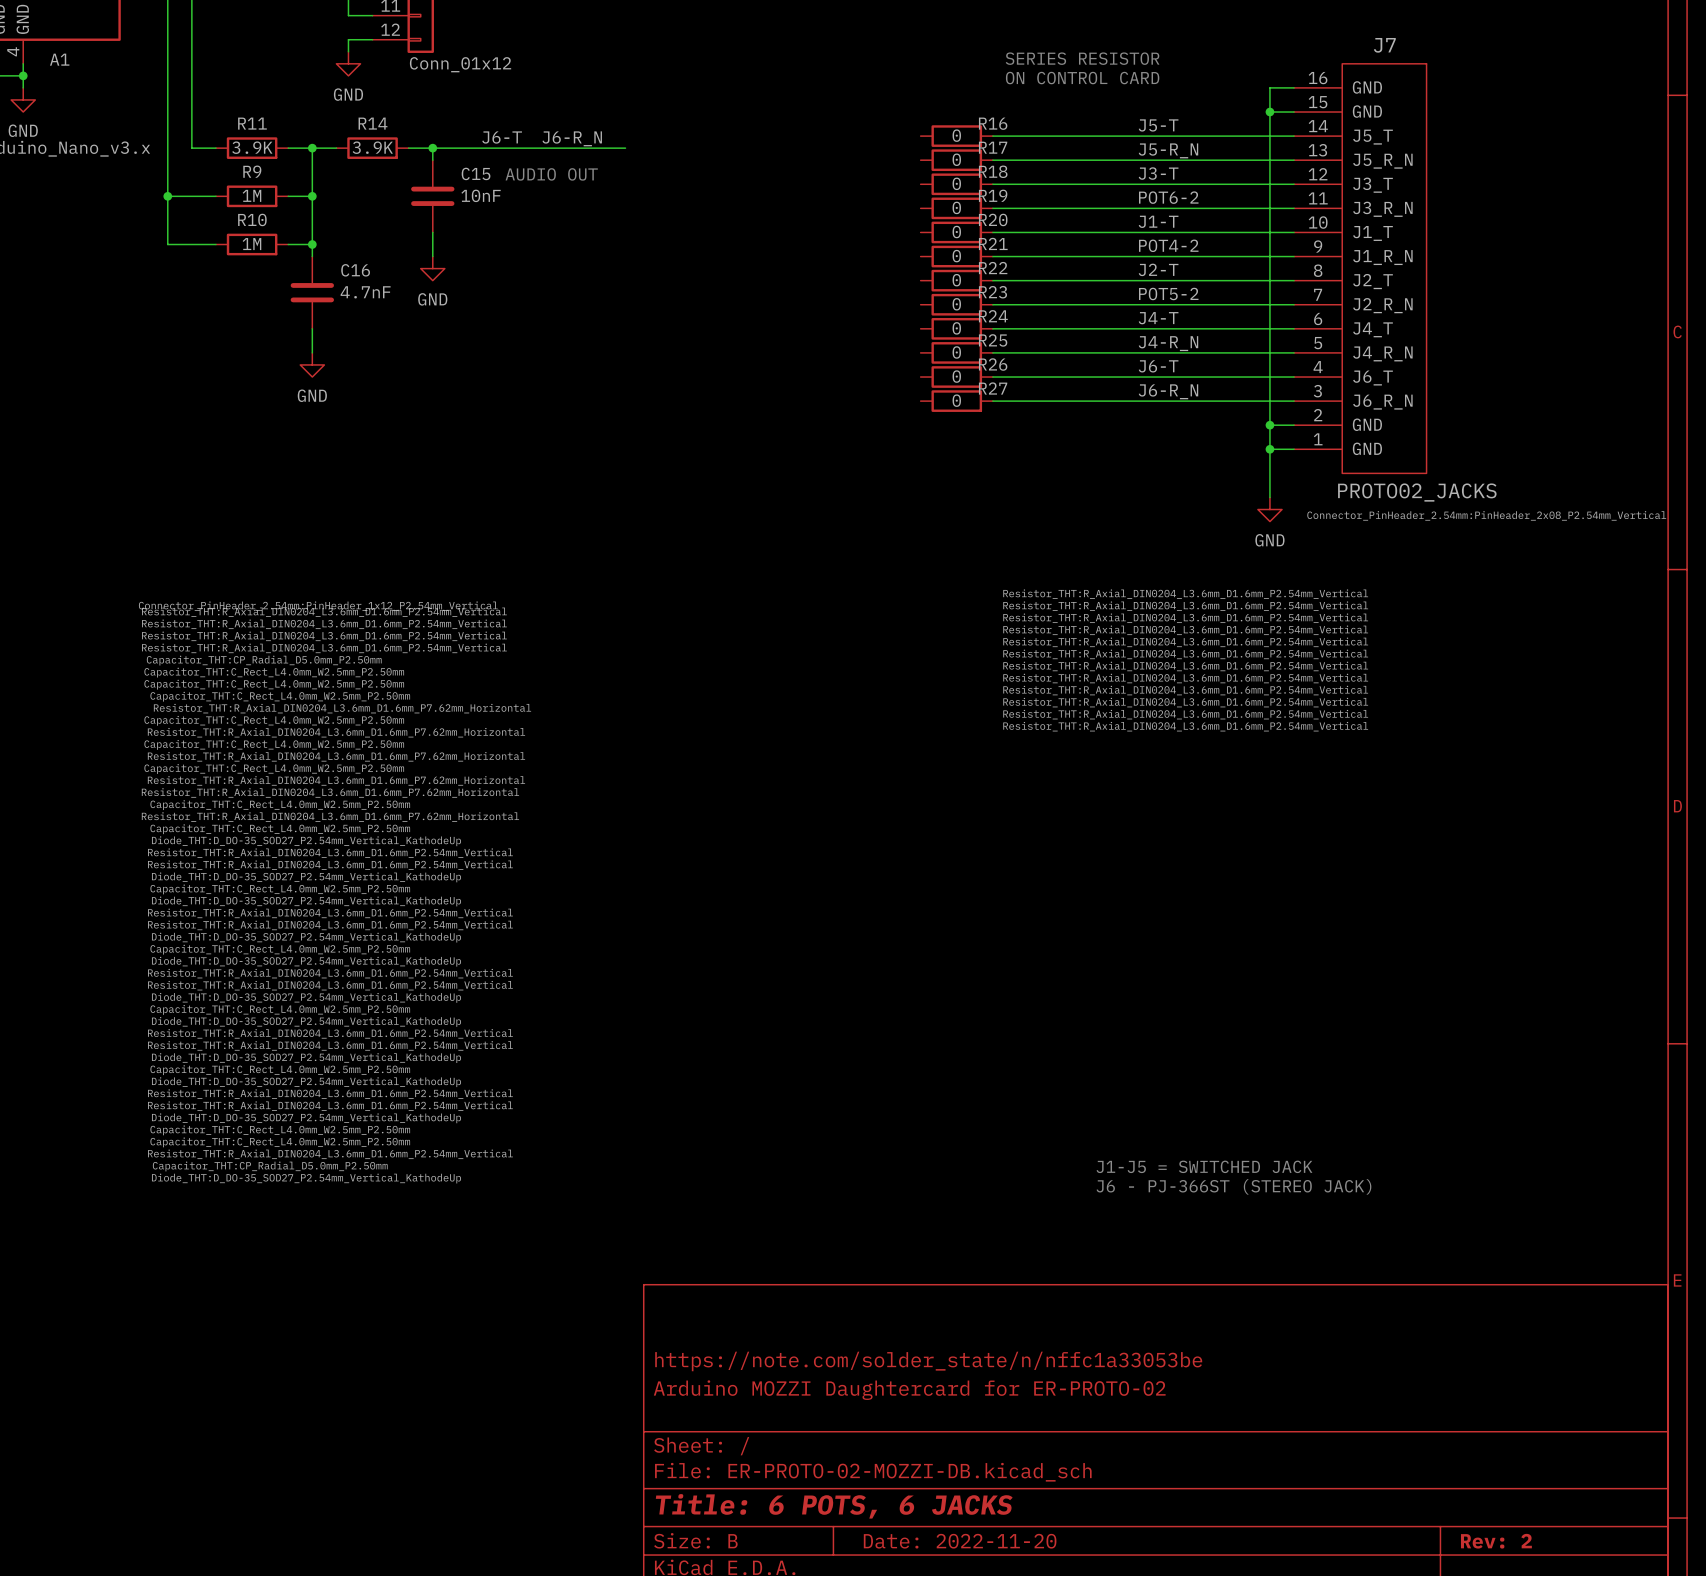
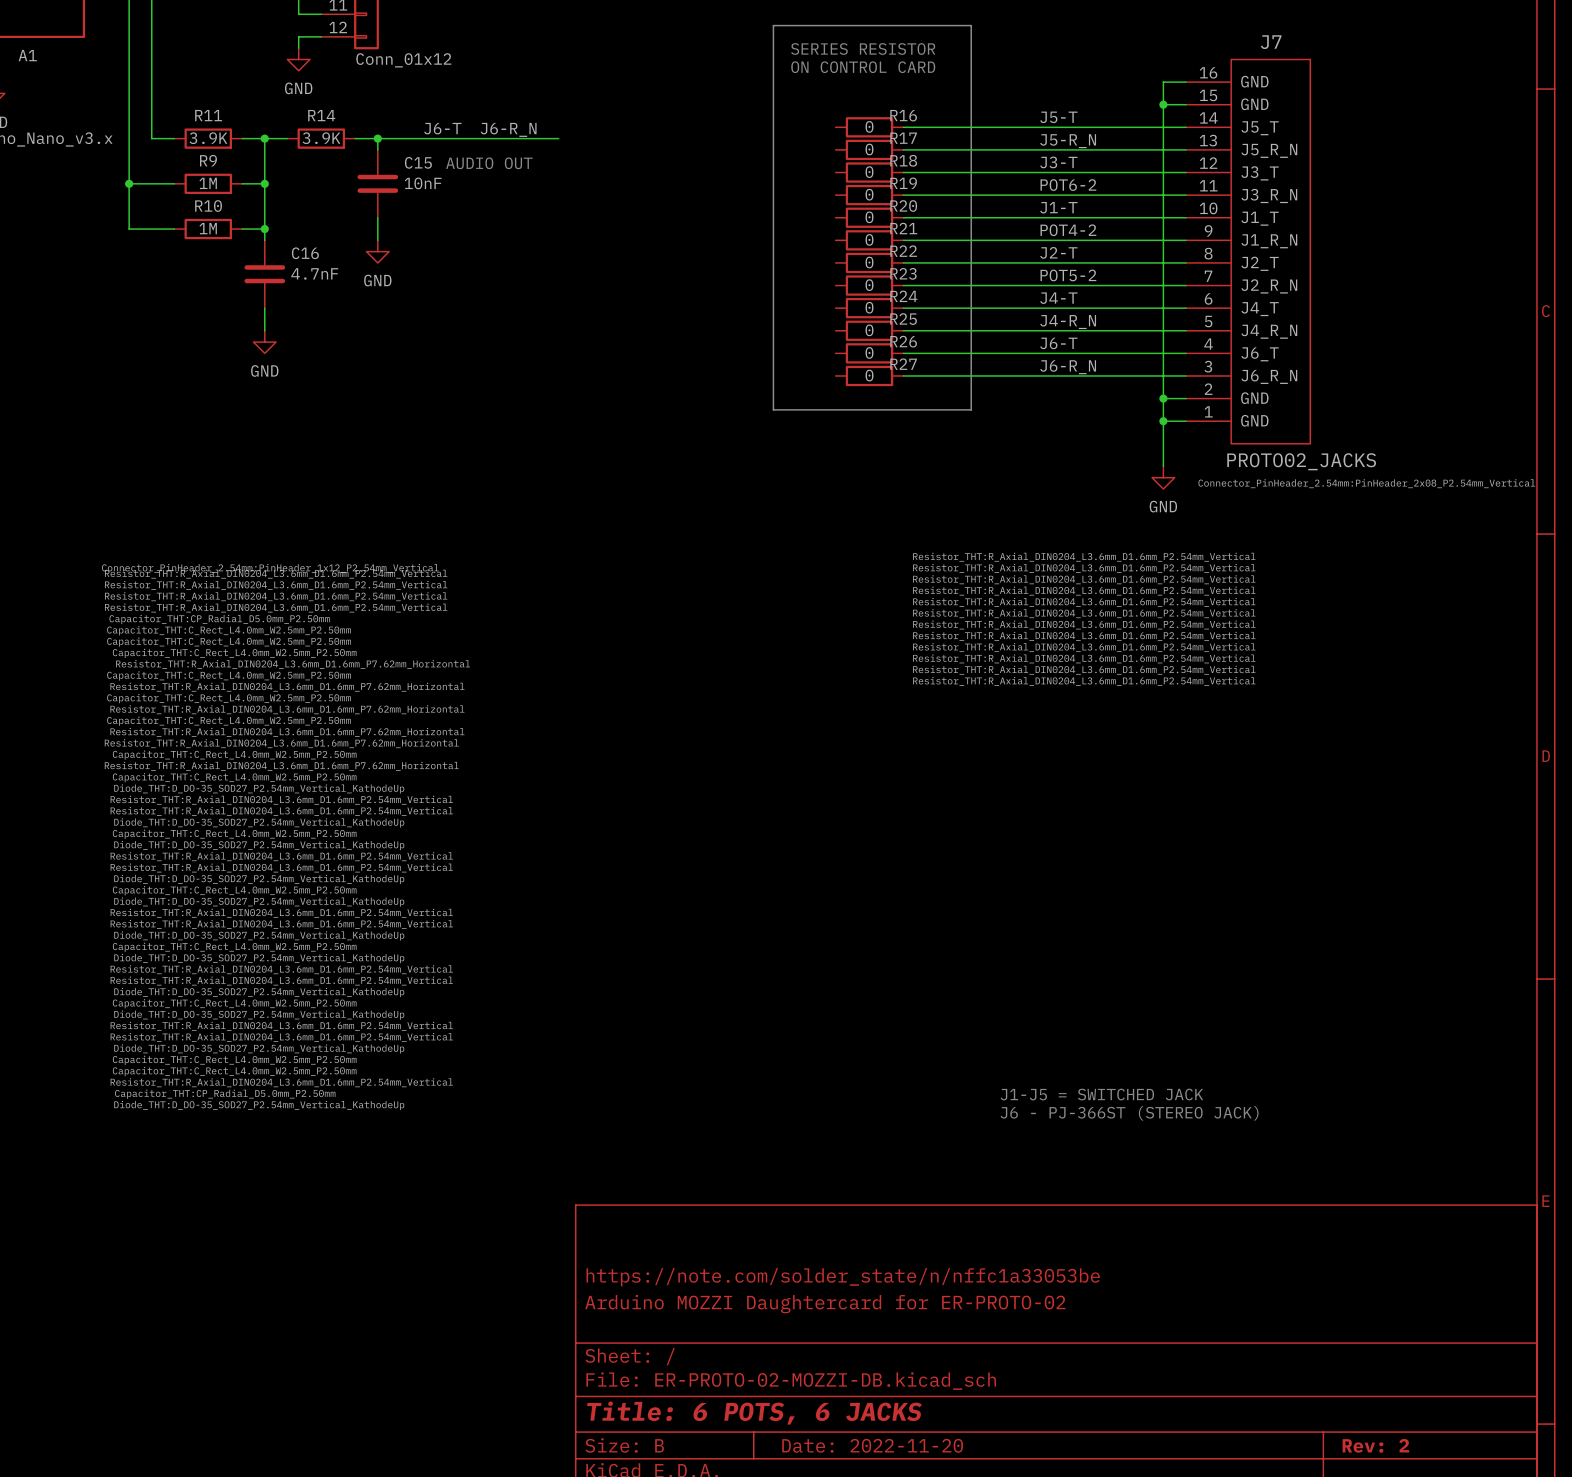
line: none -> (773, 25) (773, 409) (971, 409) (971, 25) (773, 25)
text position: SERIES RESISTOR (1082, 58) -> SERIES RESISTOR (863, 48)
text position: ON CONTROL CARD (1082, 78) -> ON CONTROL CARD (863, 67)

